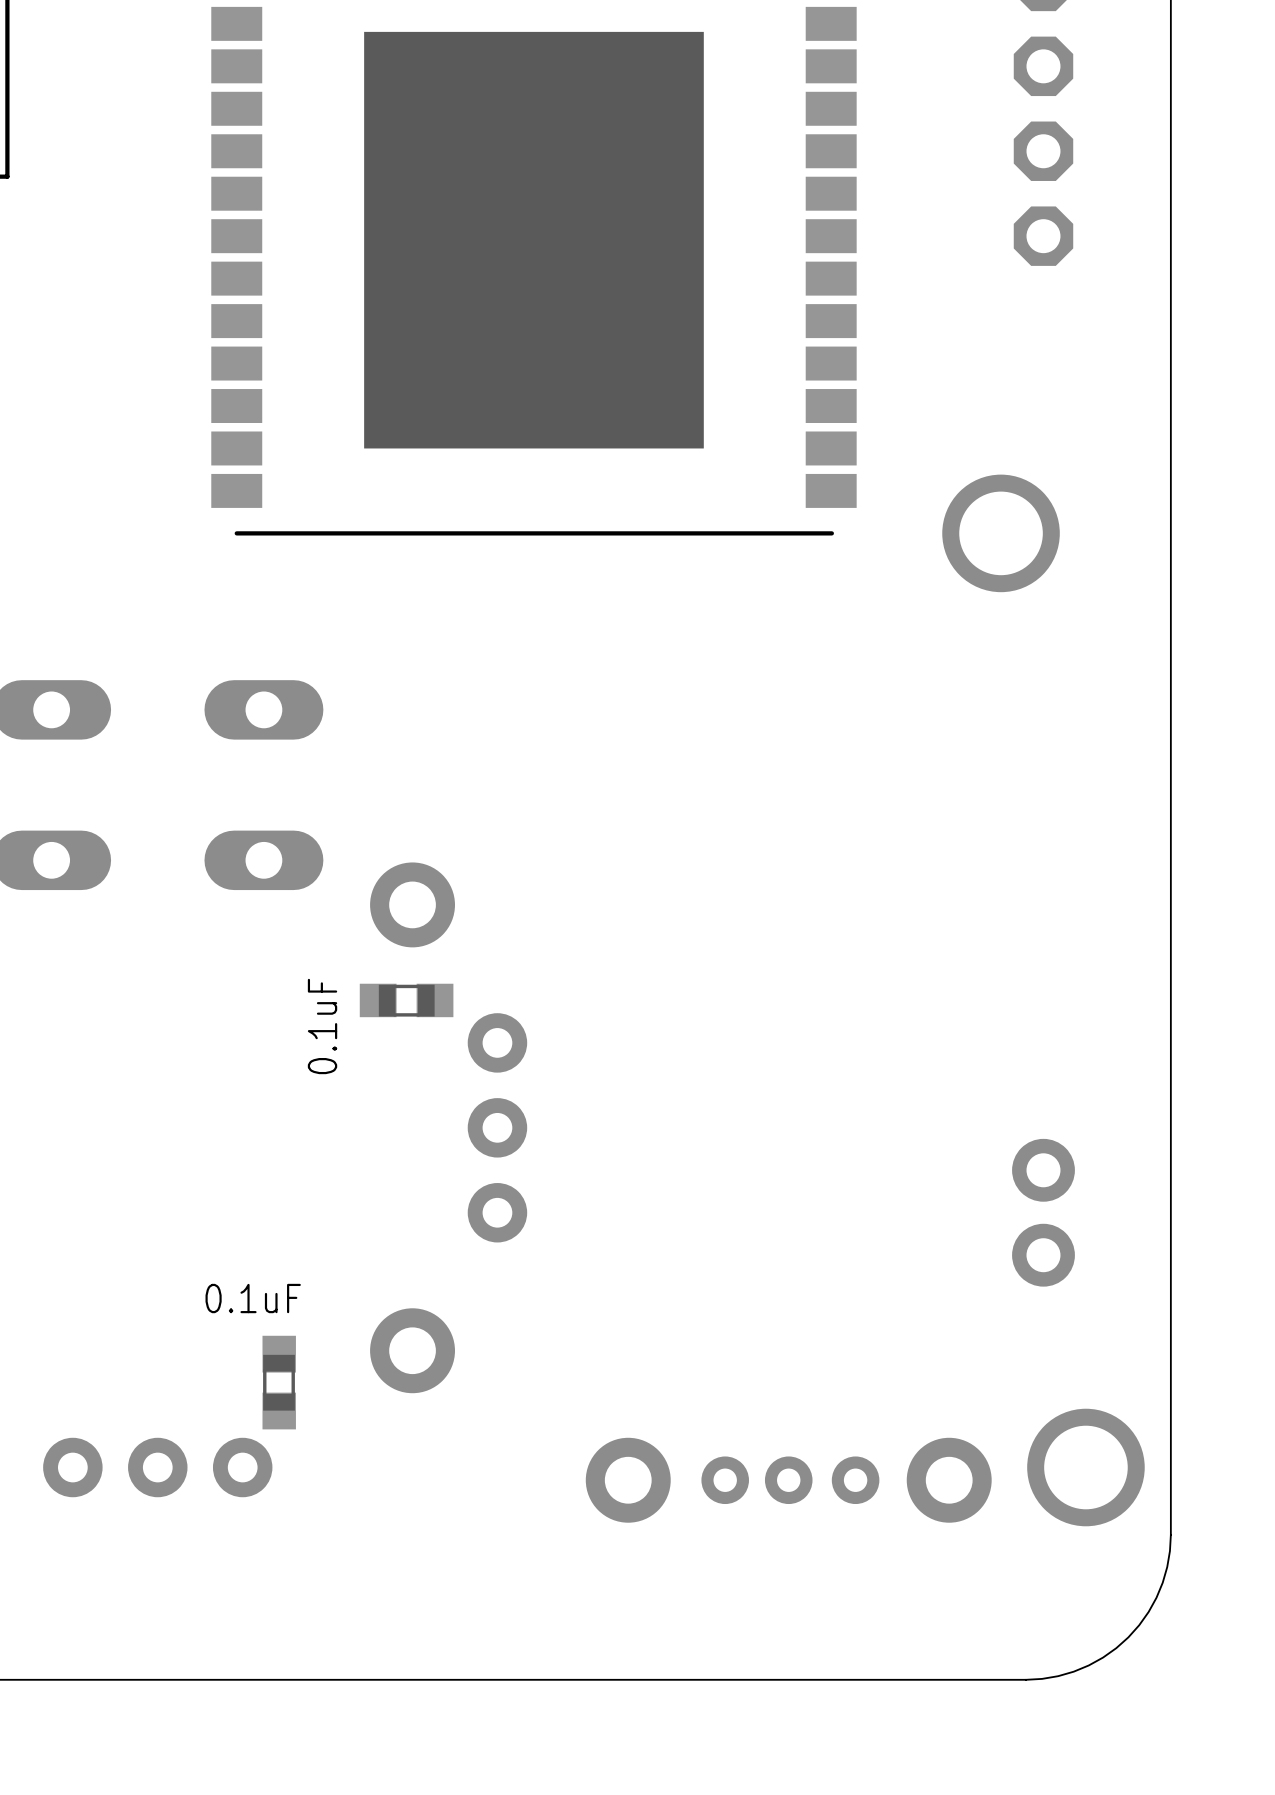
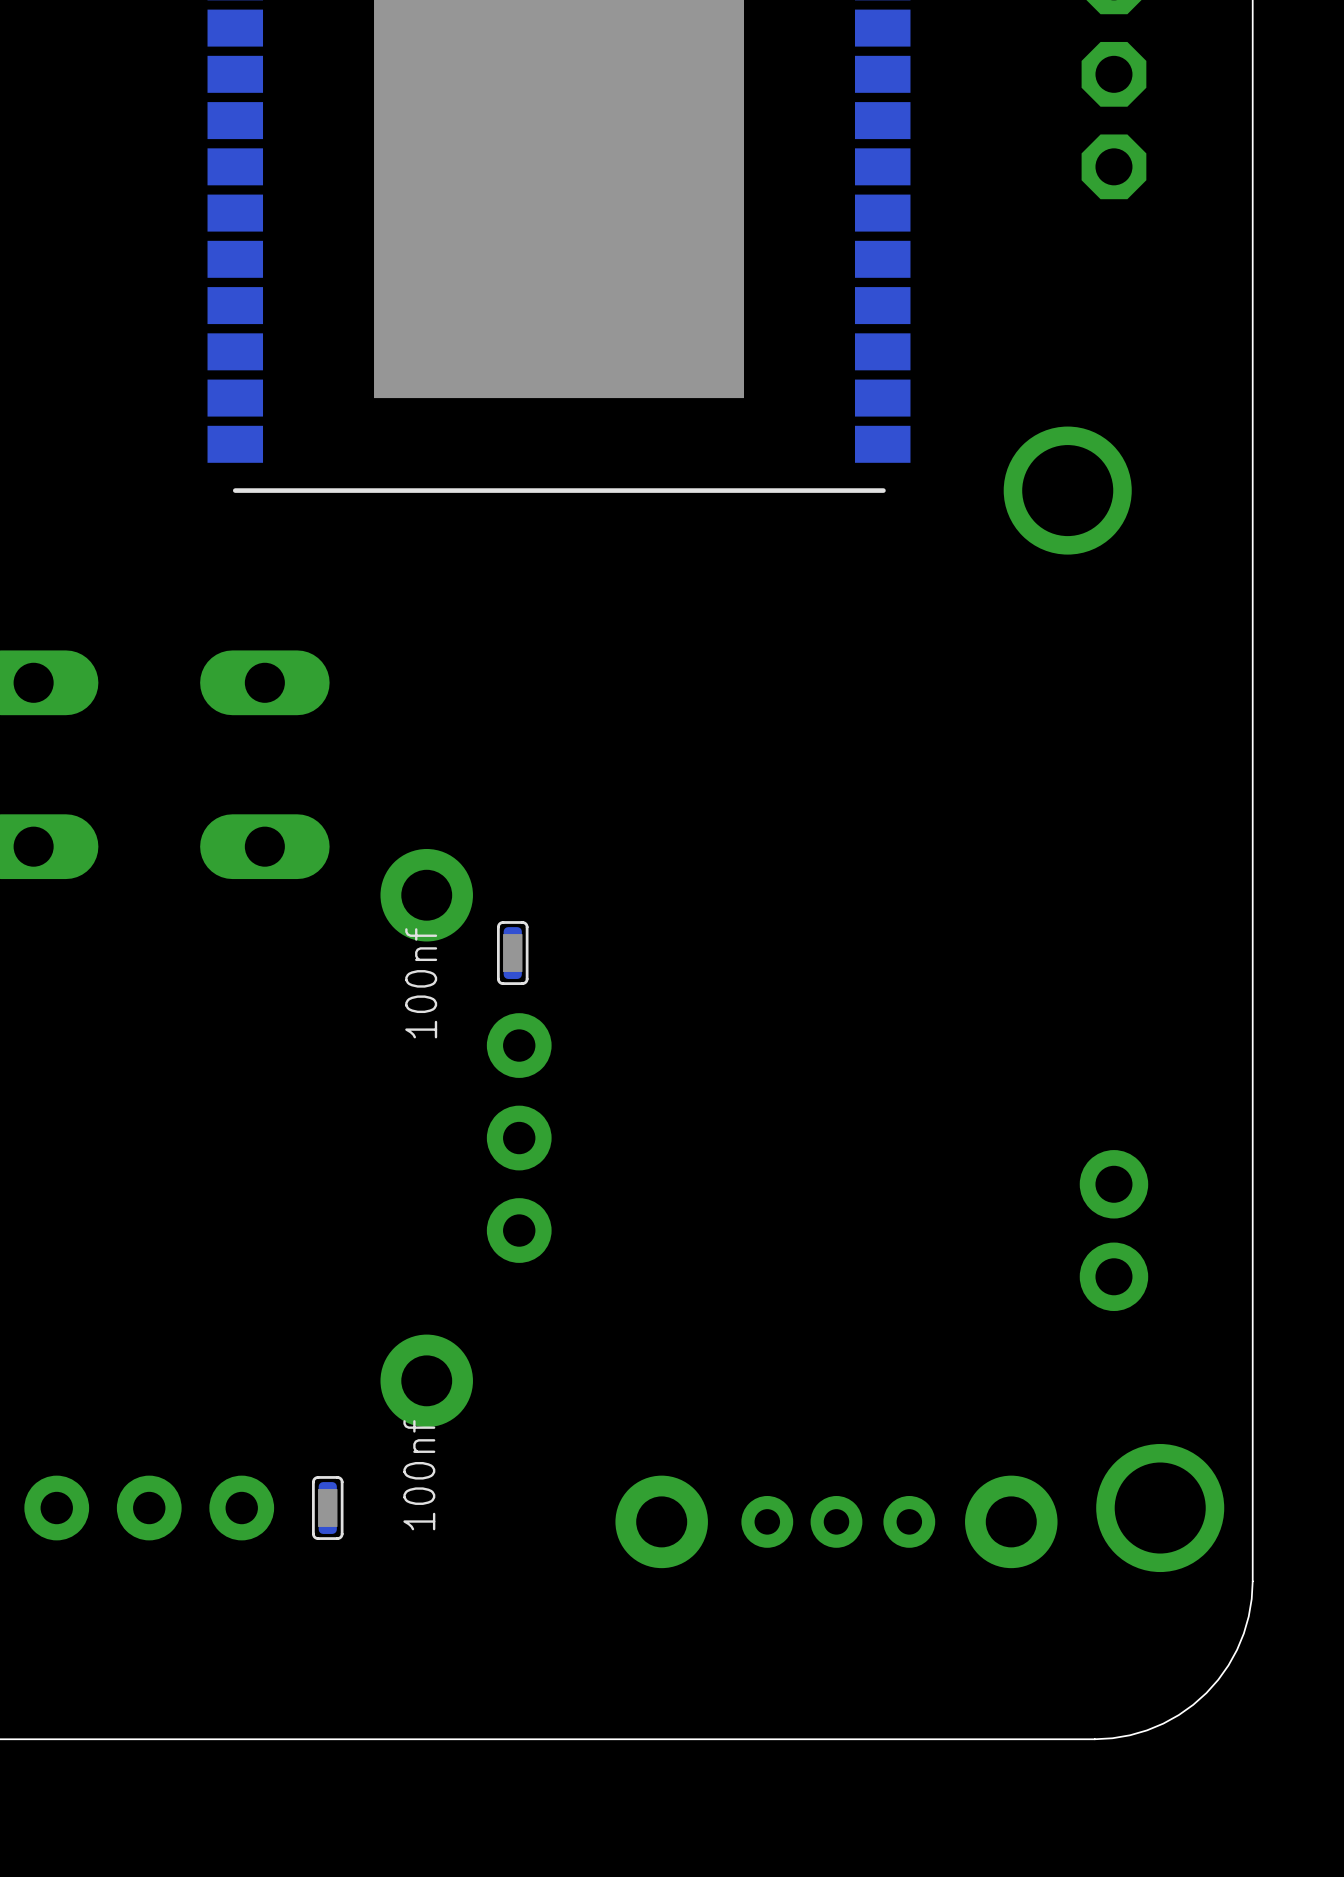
part: none -> 100nf (512, 953)
part: 0.1uF (406, 1000) -> none
part: 0.1uF (279, 1382) -> none
part: none -> 100nf (327, 1508)

